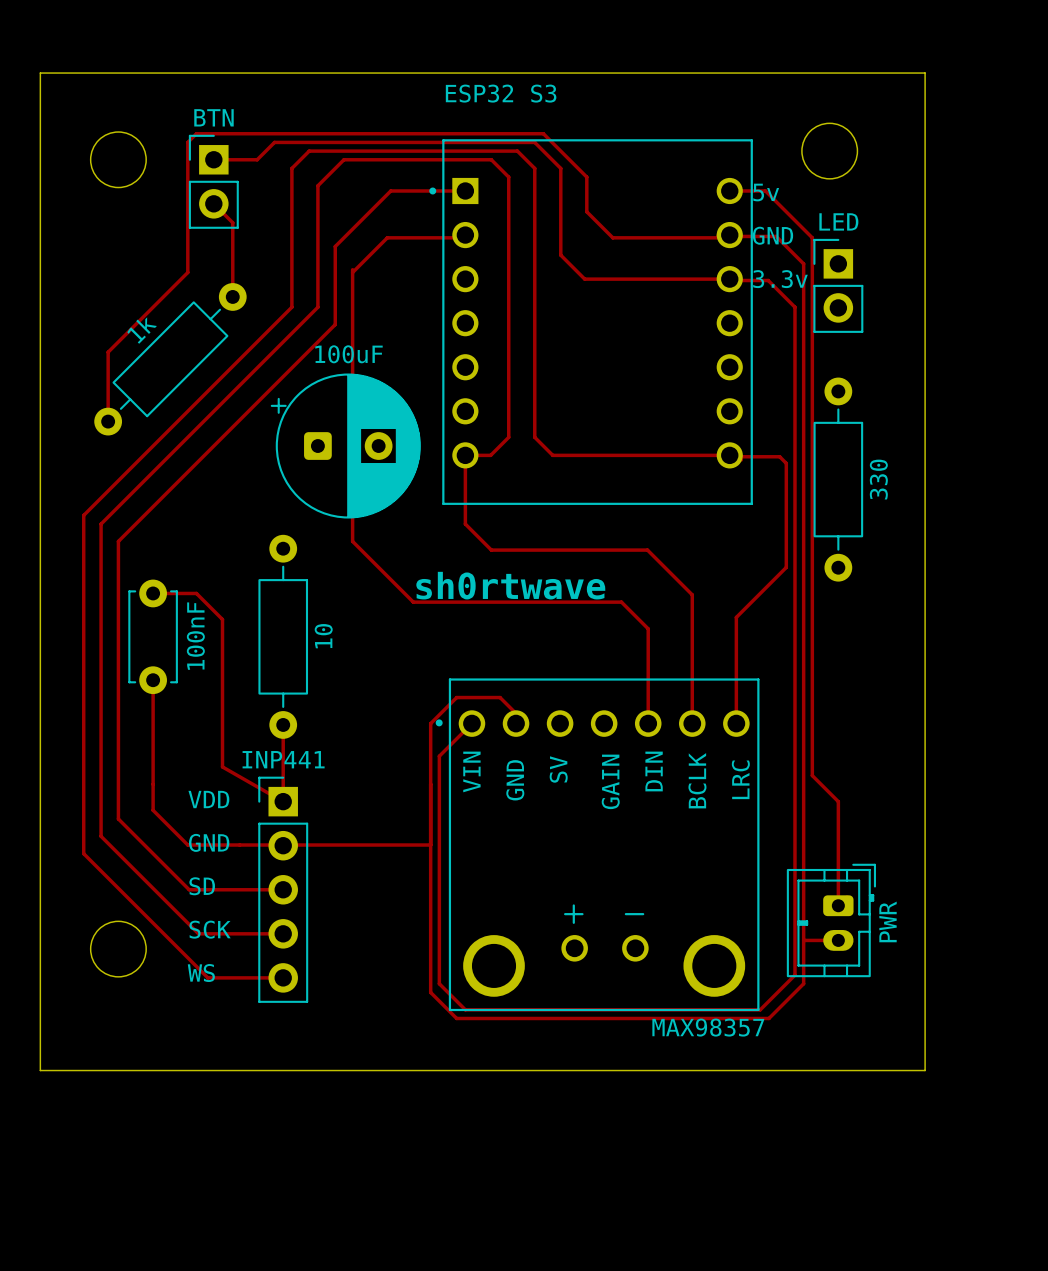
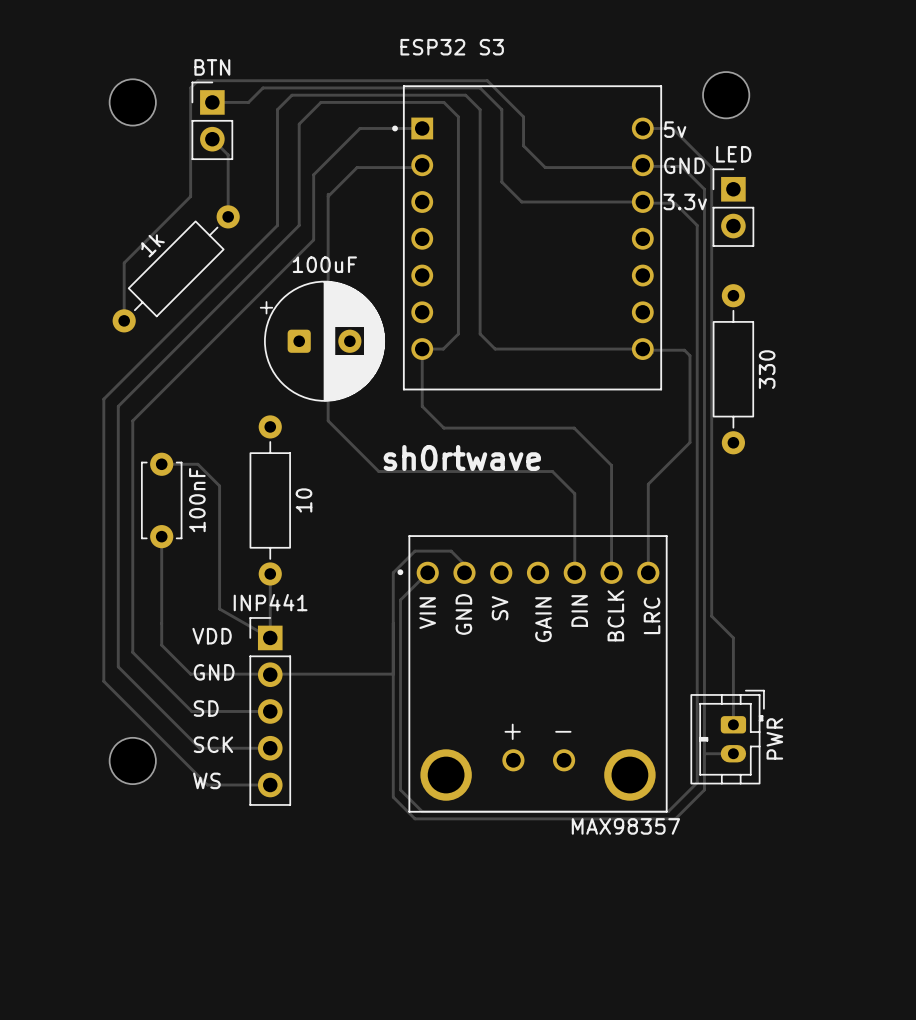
board edge: (40, 73) (925, 73) (925, 1070) (40, 1070) (40, 73) -> none

